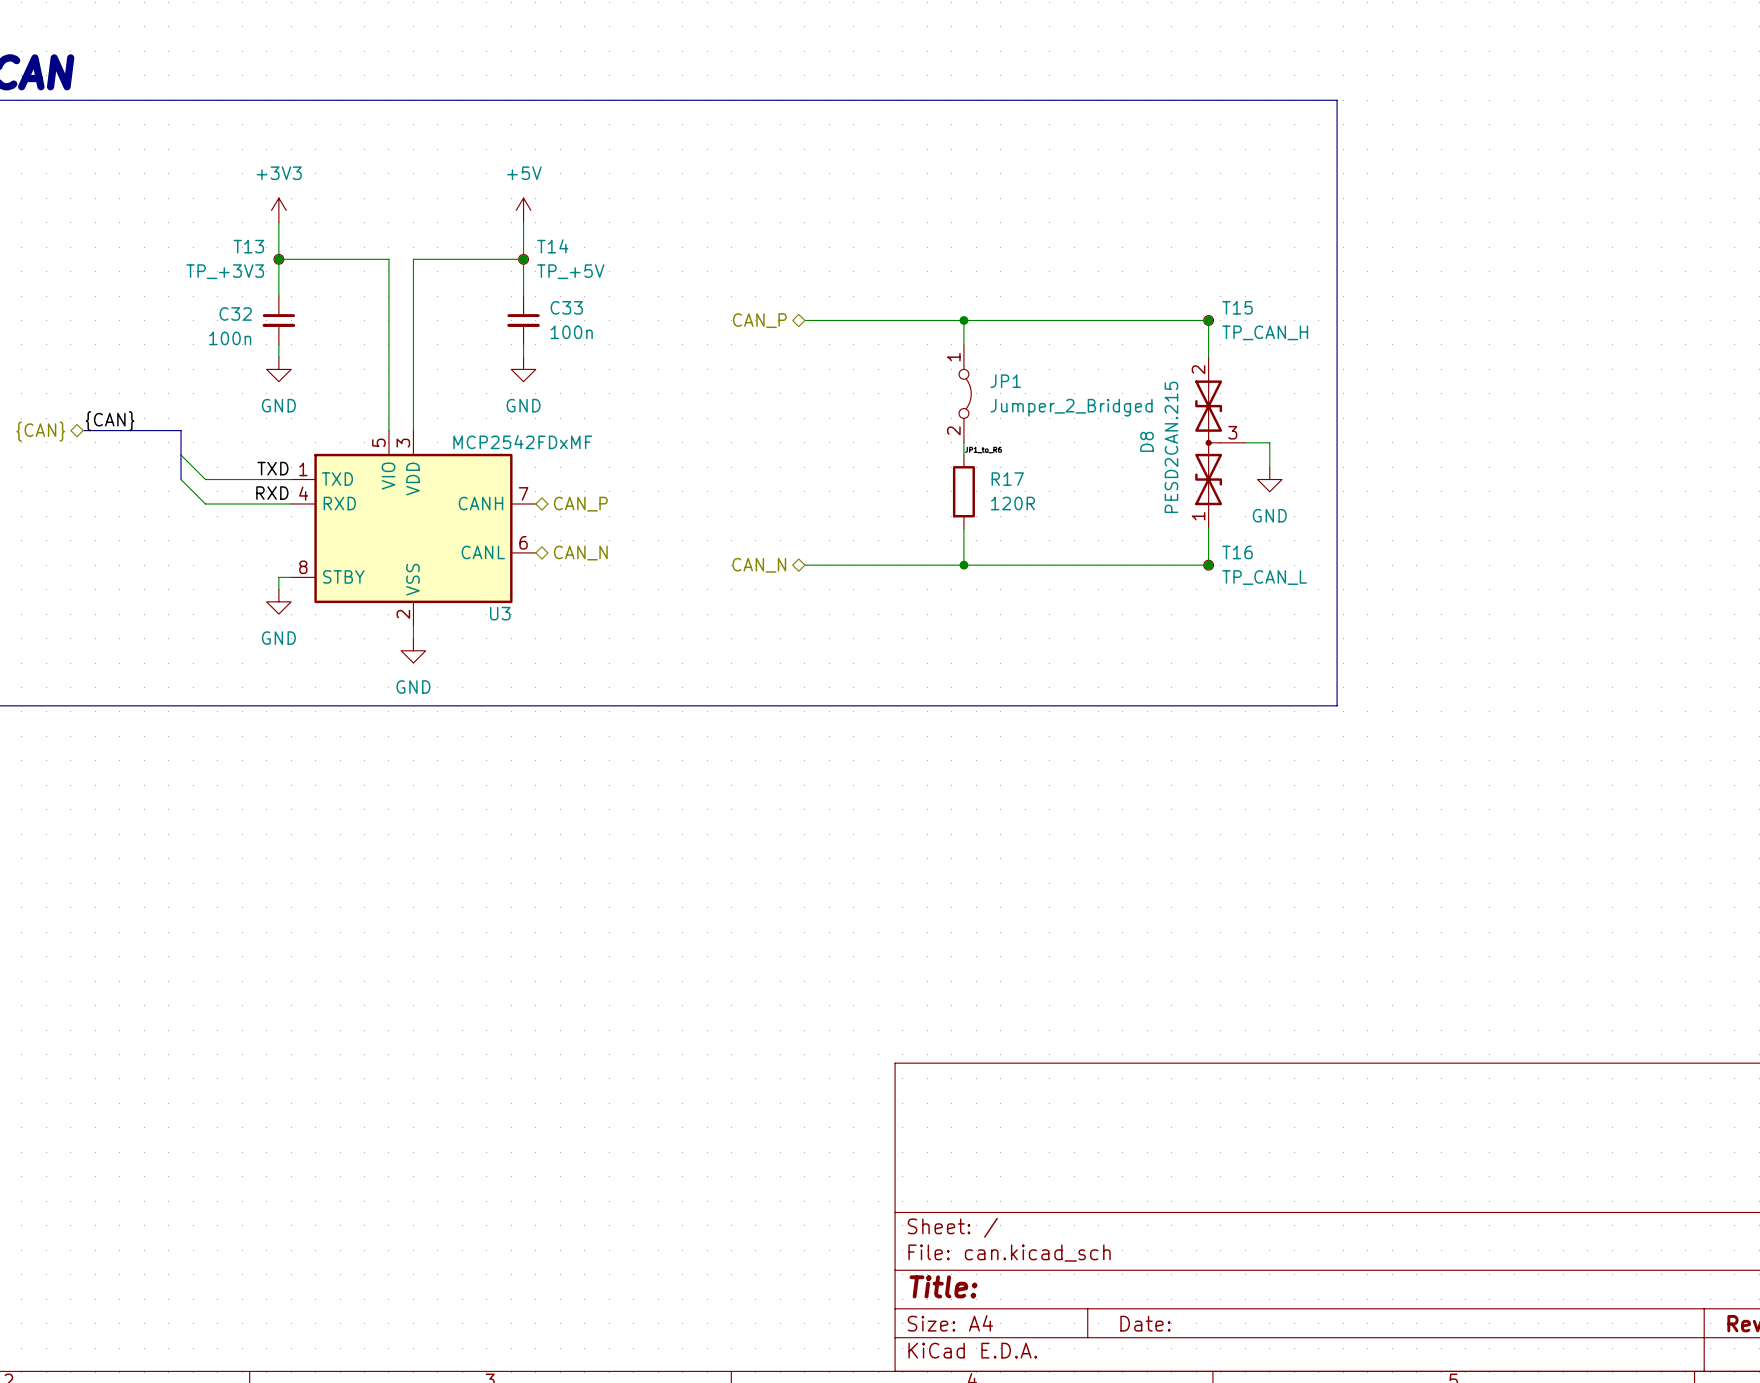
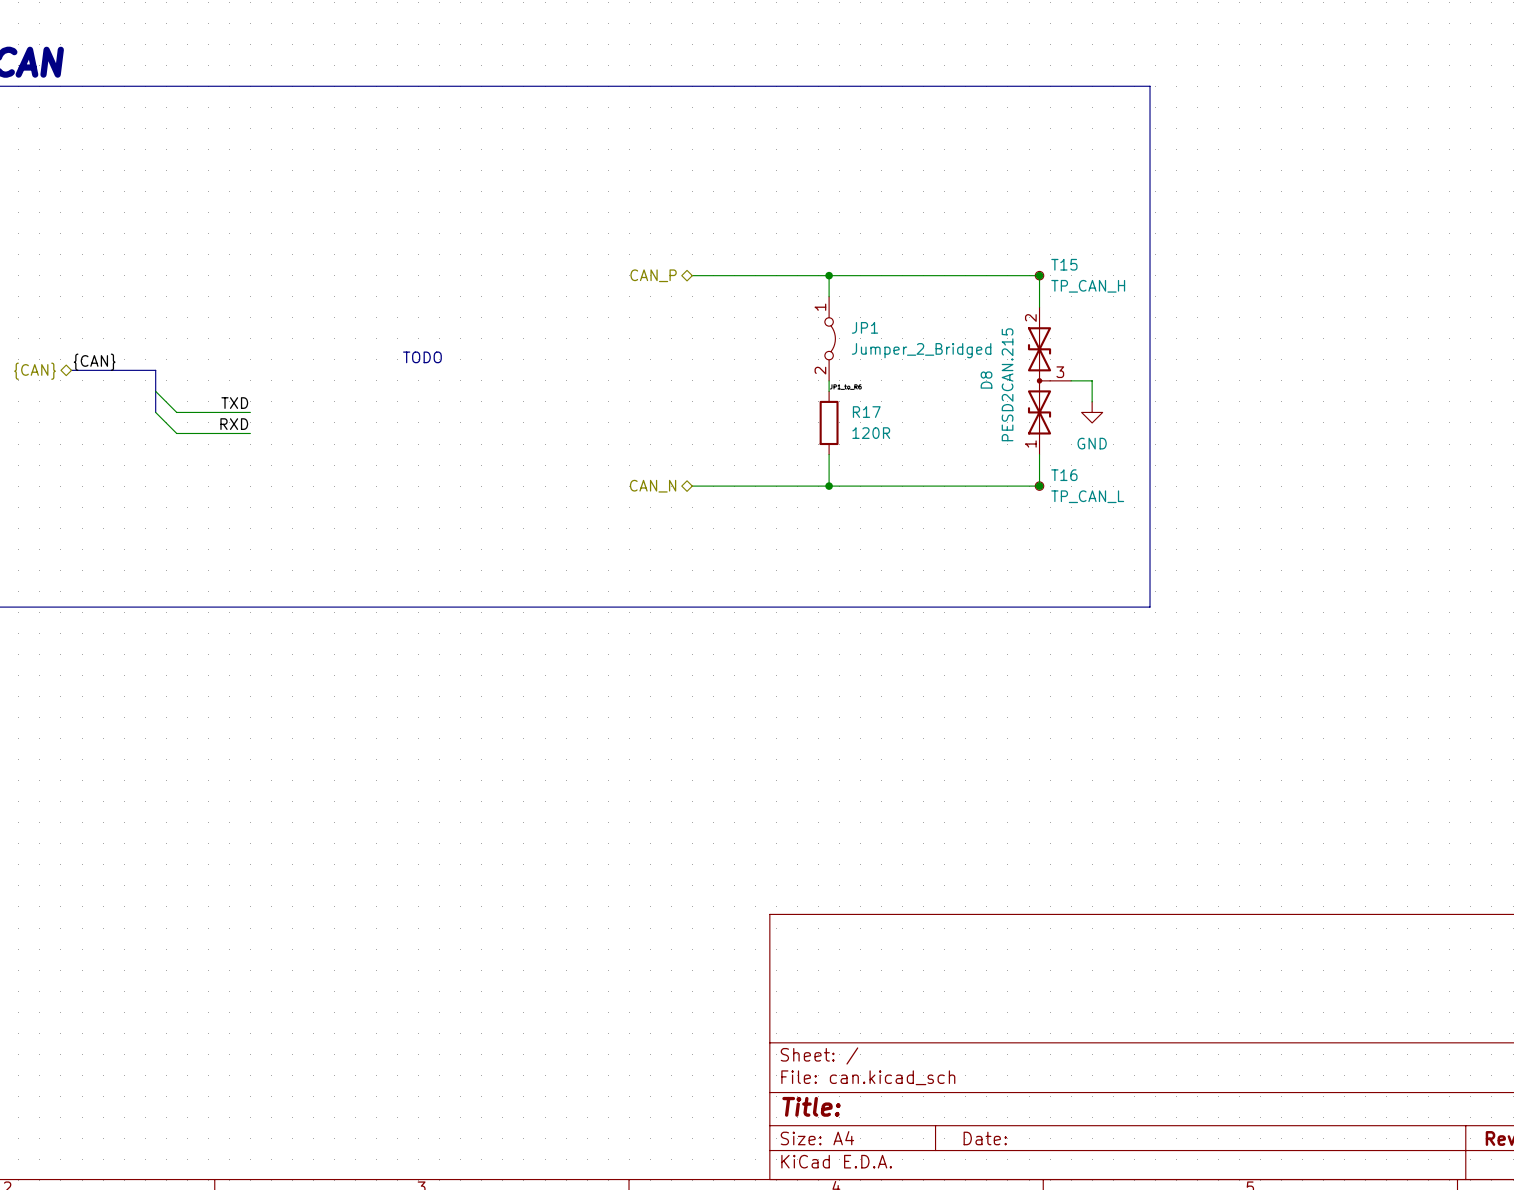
power symbol: +3V3 (278, 210) -> none
power symbol: +5V (523, 210) -> none
wire: (278, 222) (278, 296) -> none
wire: (523, 222) (523, 296) -> none
wire: (278, 259) (388, 259) (388, 430) -> none
junction: (278, 259) -> none
T13: TP_+3V3 (278, 259) -> none
wire: (523, 259) (413, 259) (413, 430) -> none
junction: (523, 259) -> none
T14: TP_+5V (523, 259) -> none
C32: 100n (278, 320) -> none
C33: 100n (523, 320) -> none
wire: (278, 344) (278, 357) -> none
wire: (523, 344) (523, 357) -> none
power symbol: GND (278, 369) -> none
power symbol: GND (523, 369) -> none
text: none -> TODO (422, 357)
hierarchical label: CAN_P (580, 504) -> none
U3: MCP2542FDxMF (413, 528) -> none
hierarchical label: CAN_N (580, 553) -> none
wire: (291, 577) (278, 577) (278, 589) -> none
power symbol: GND (278, 601) -> none
wire: (413, 626) (413, 638) -> none
power symbol: GND (413, 650) -> none

